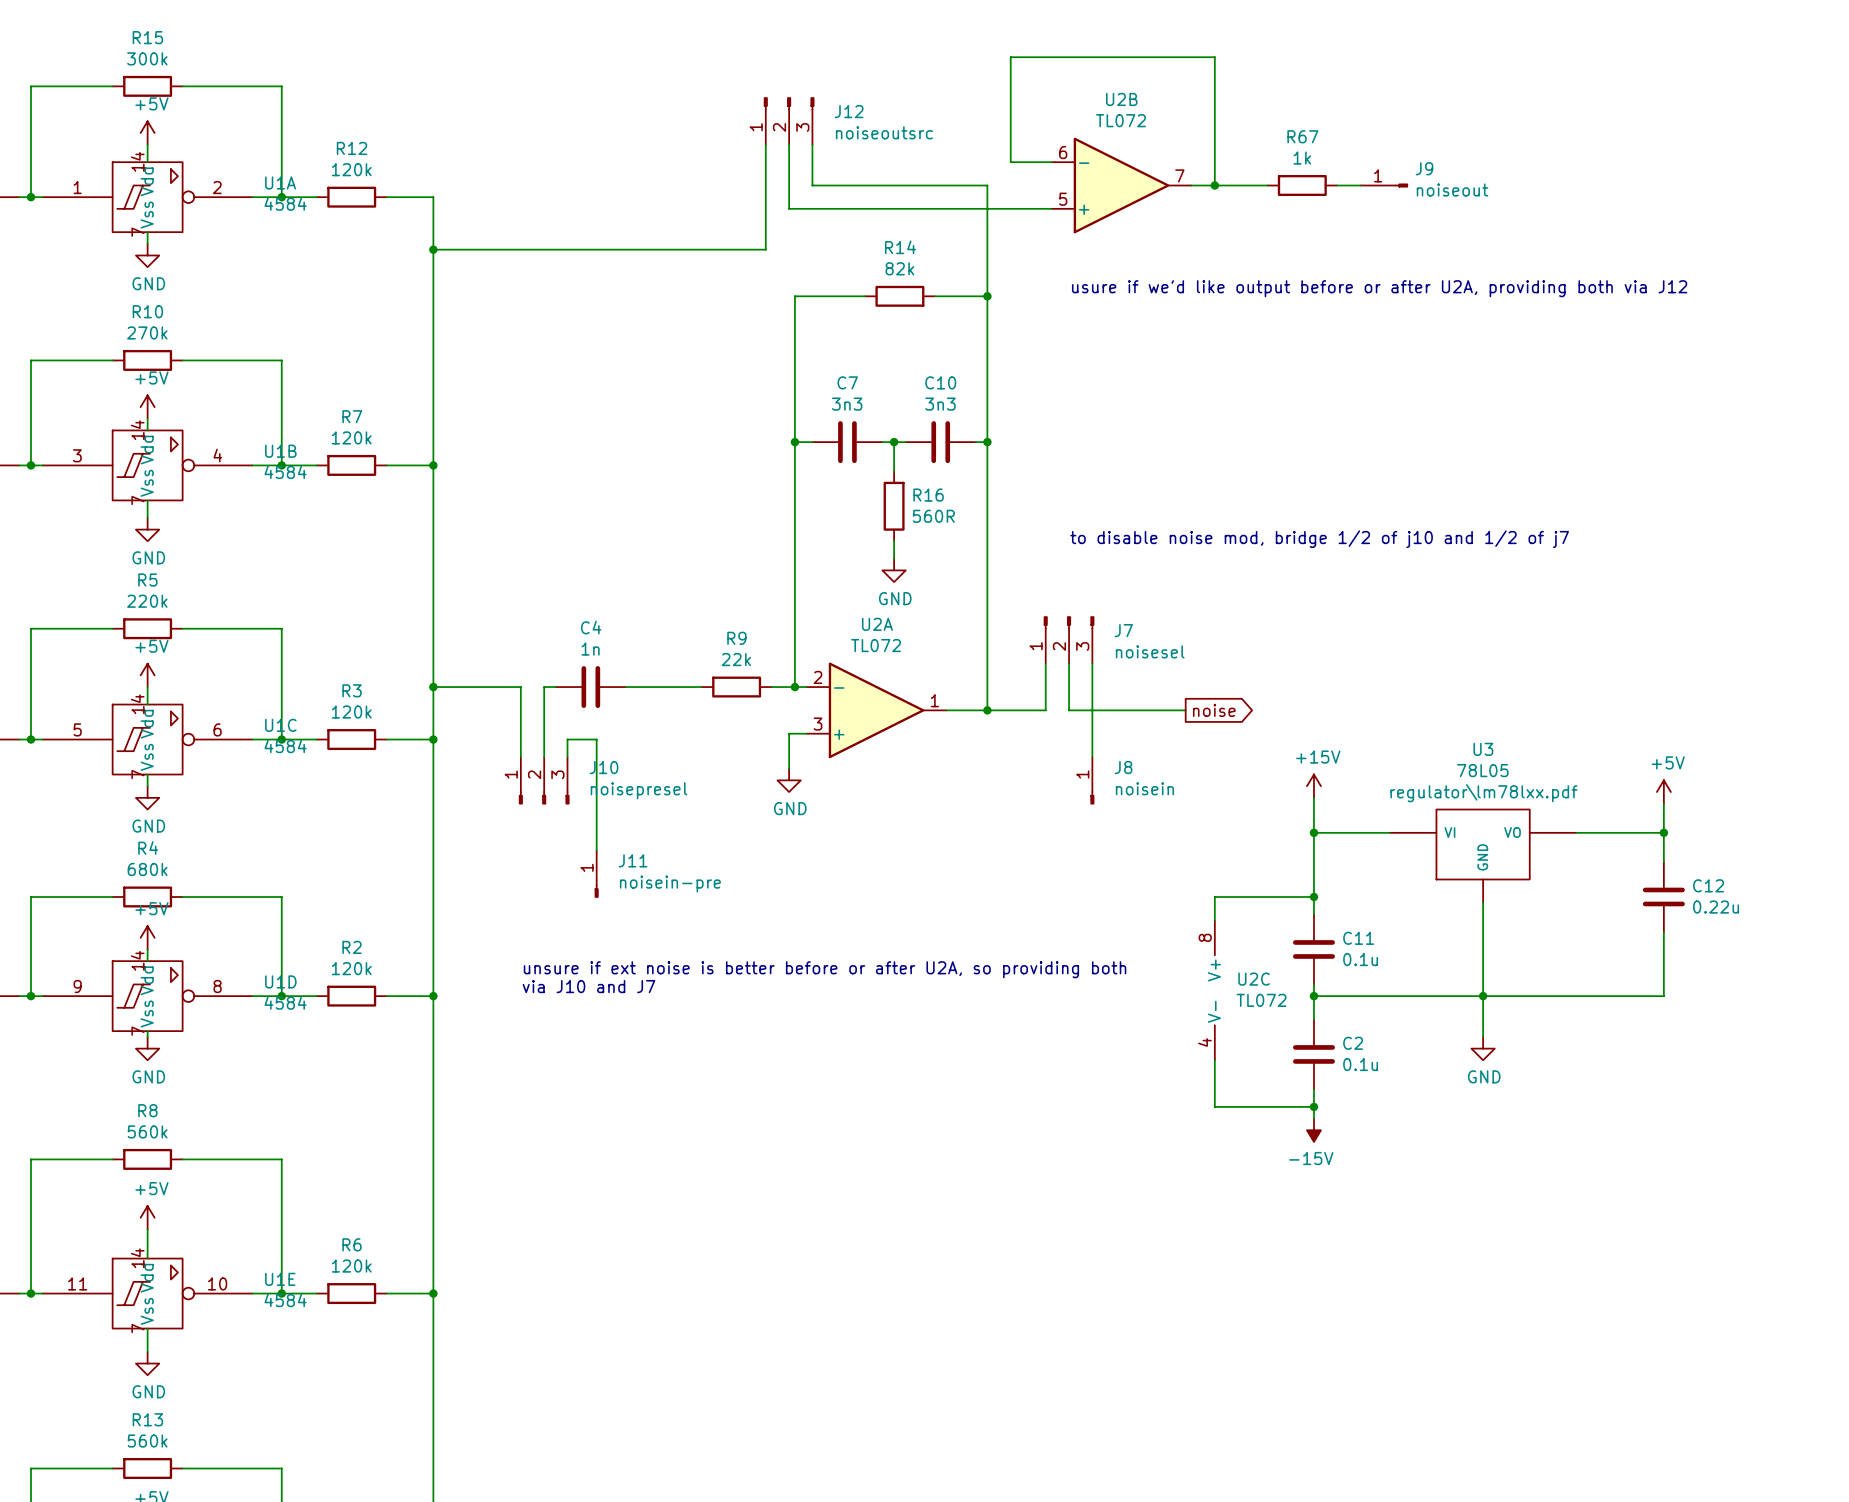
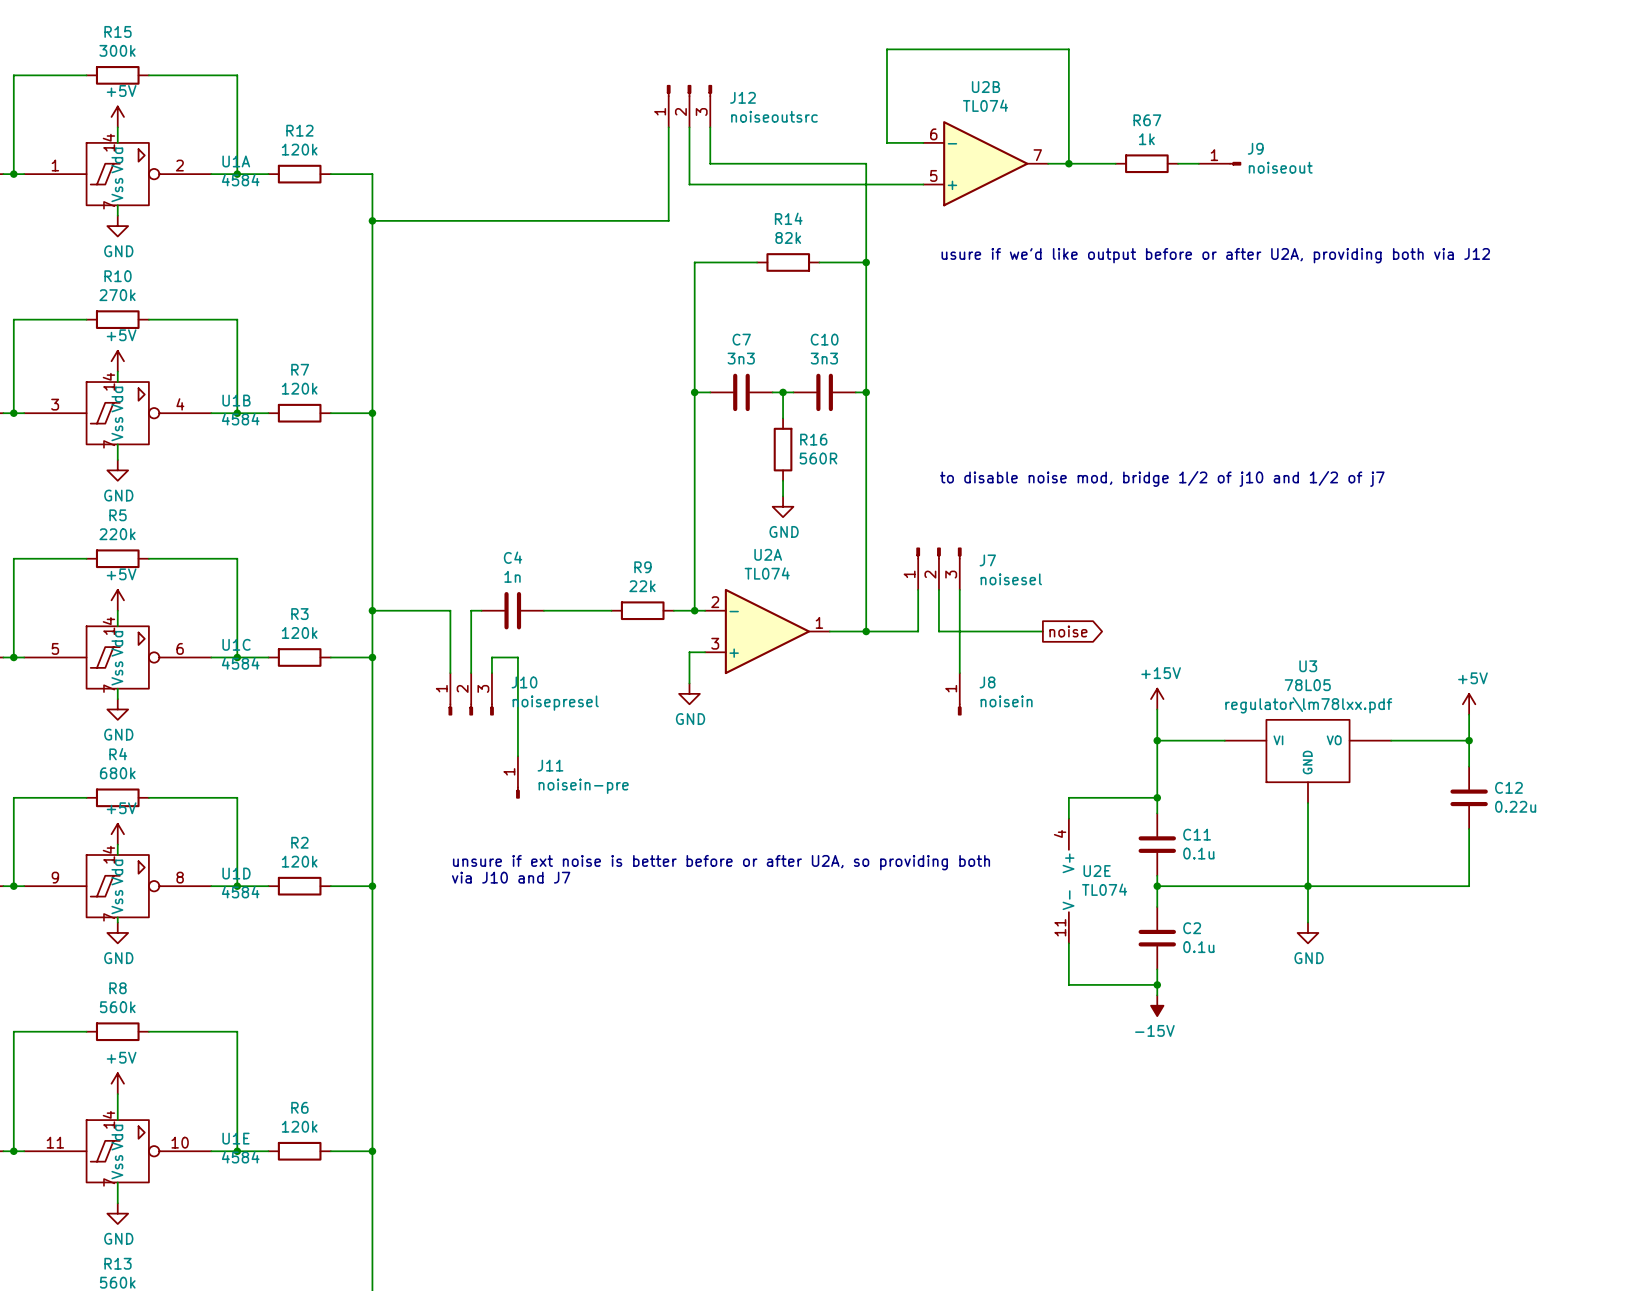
U2B value: TL072 (1120, 120) -> TL074 (985, 105)
U2A value: TL072 (876, 645) -> TL074 (767, 573)
U2C pin number: 8 (1205, 937) -> 4 (1060, 833)
U2C name: U2C (1254, 979) -> U2E (1097, 871)
U2C value: TL072 (1261, 1000) -> TL074 (1104, 889)
U2C pin number: 4 (1204, 1042) -> 11 (1060, 927)

